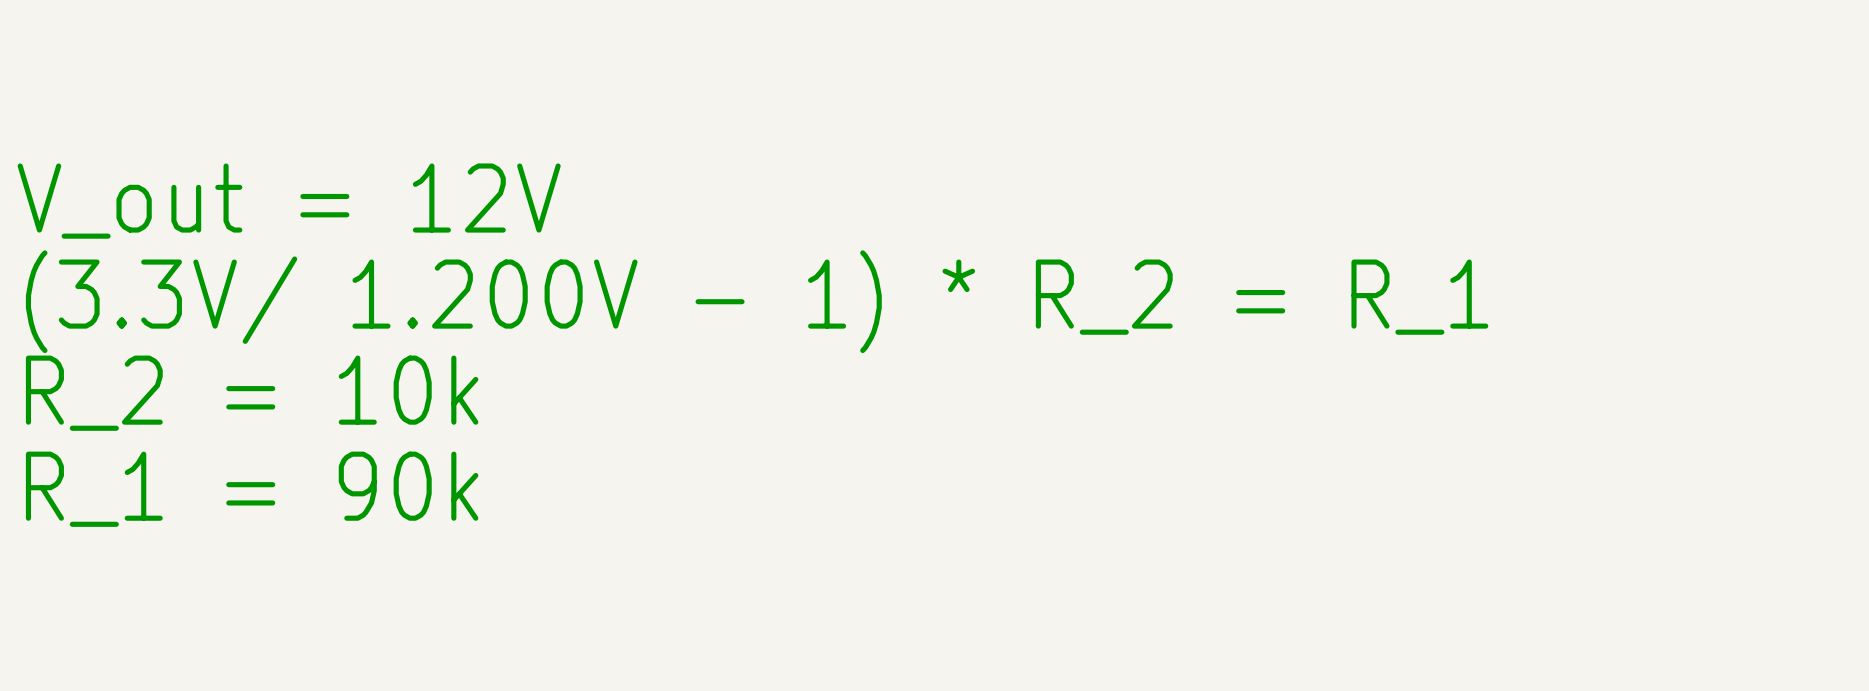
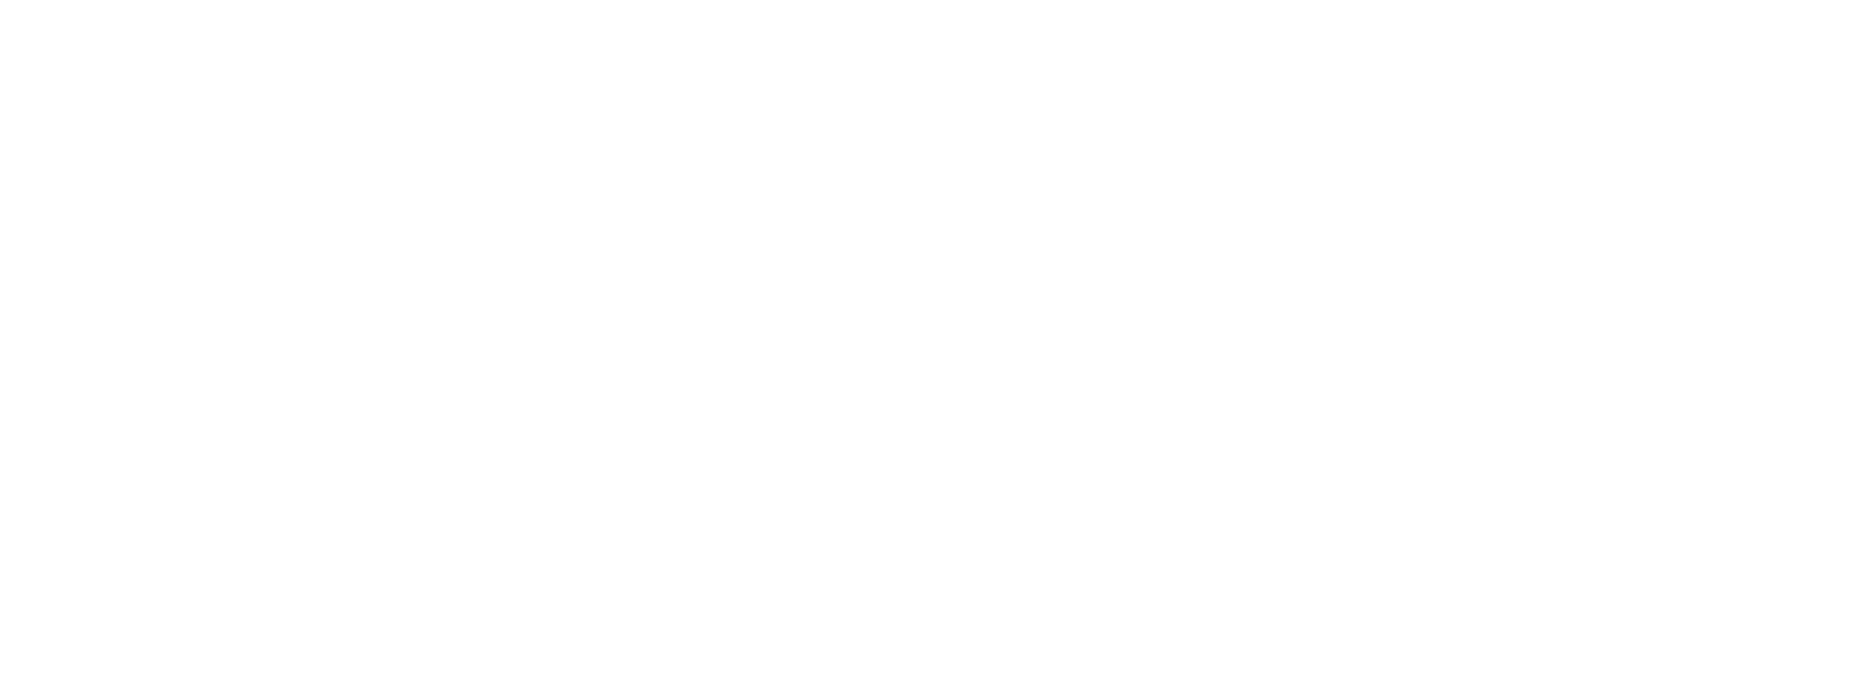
text: V_out = 12V (289, 201) -> none
text: (3.3V/ 1.200V - 1) * R_2 = R_1 (757, 301) -> none
text: R_2 = 10k (252, 393) -> none
text: R_1 = 90k (252, 489) -> none

